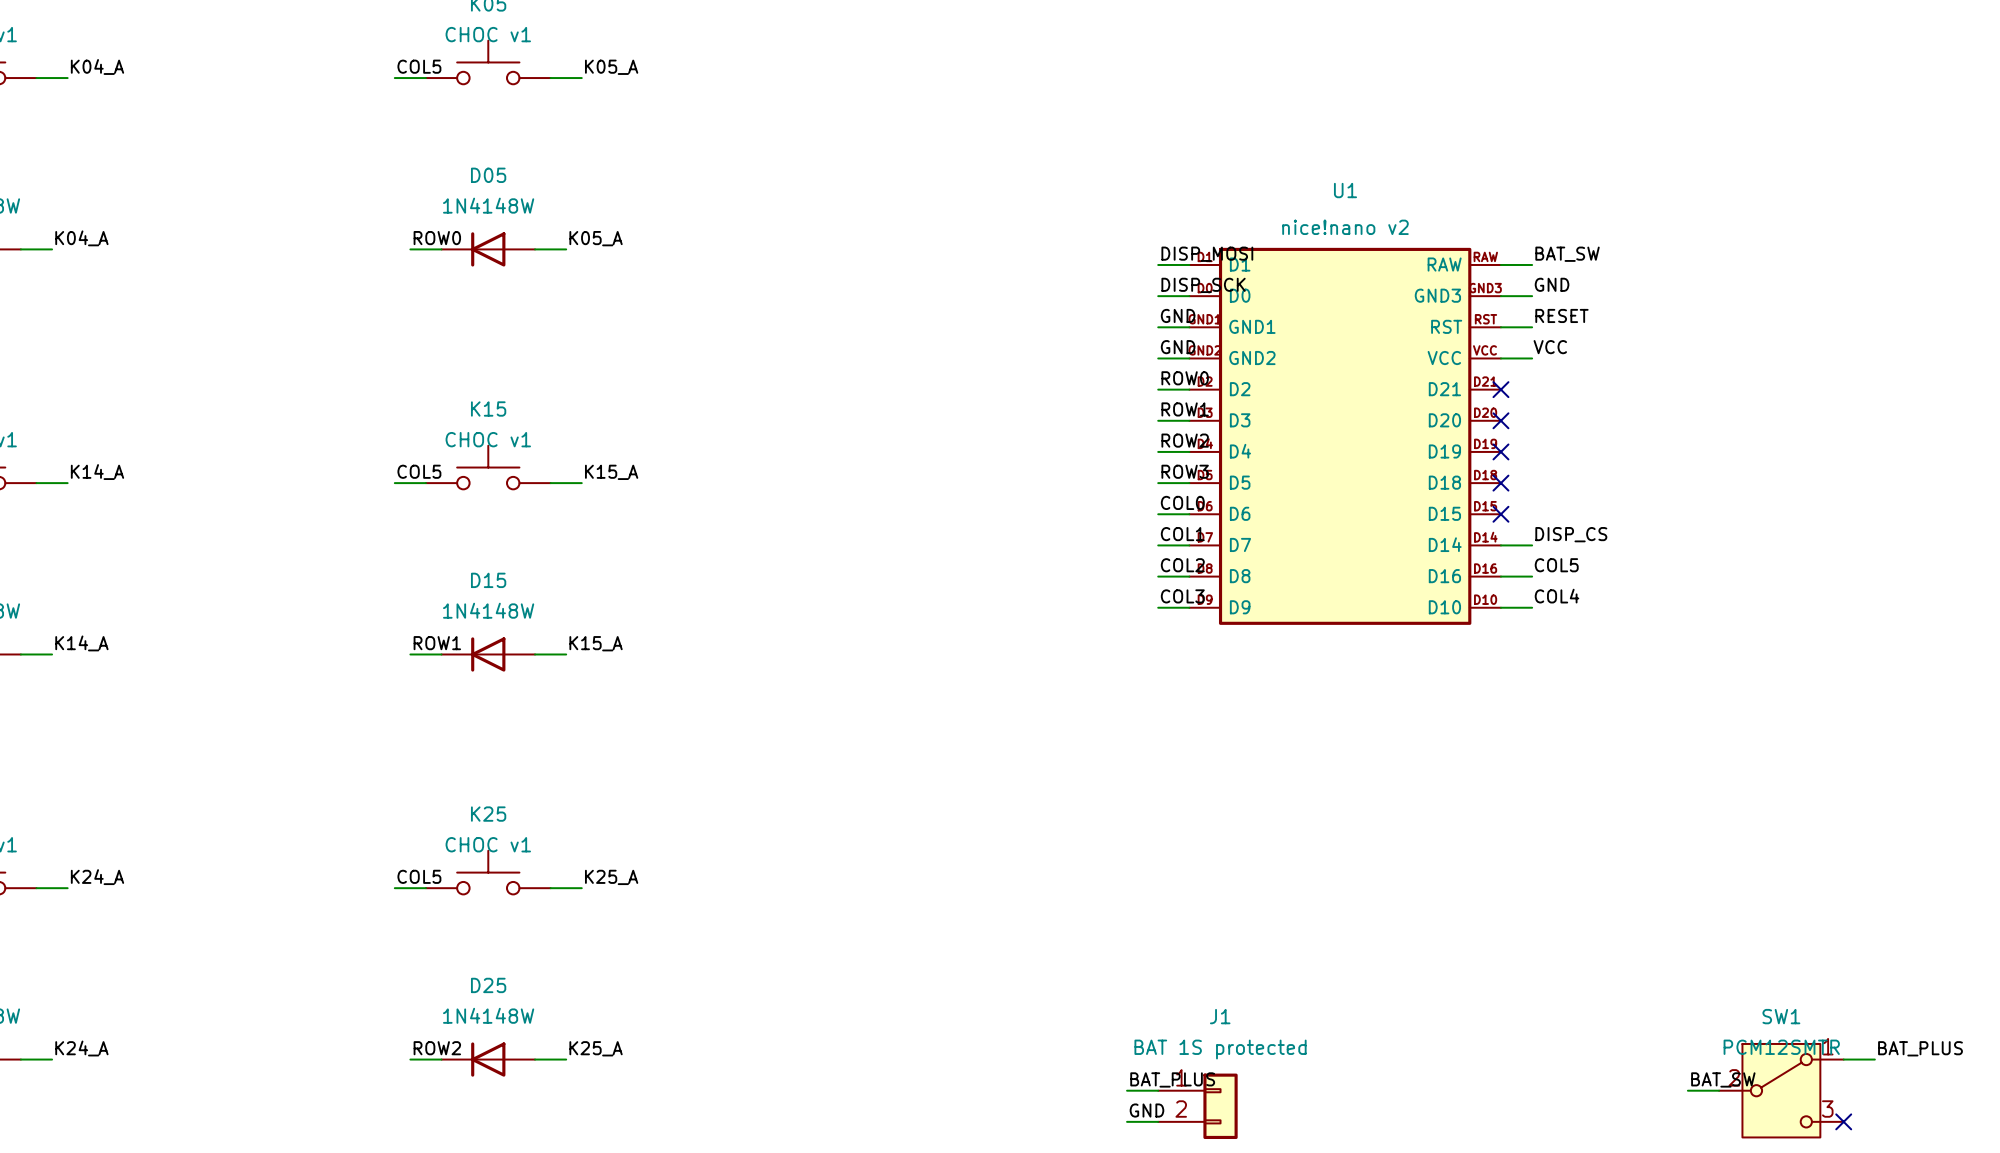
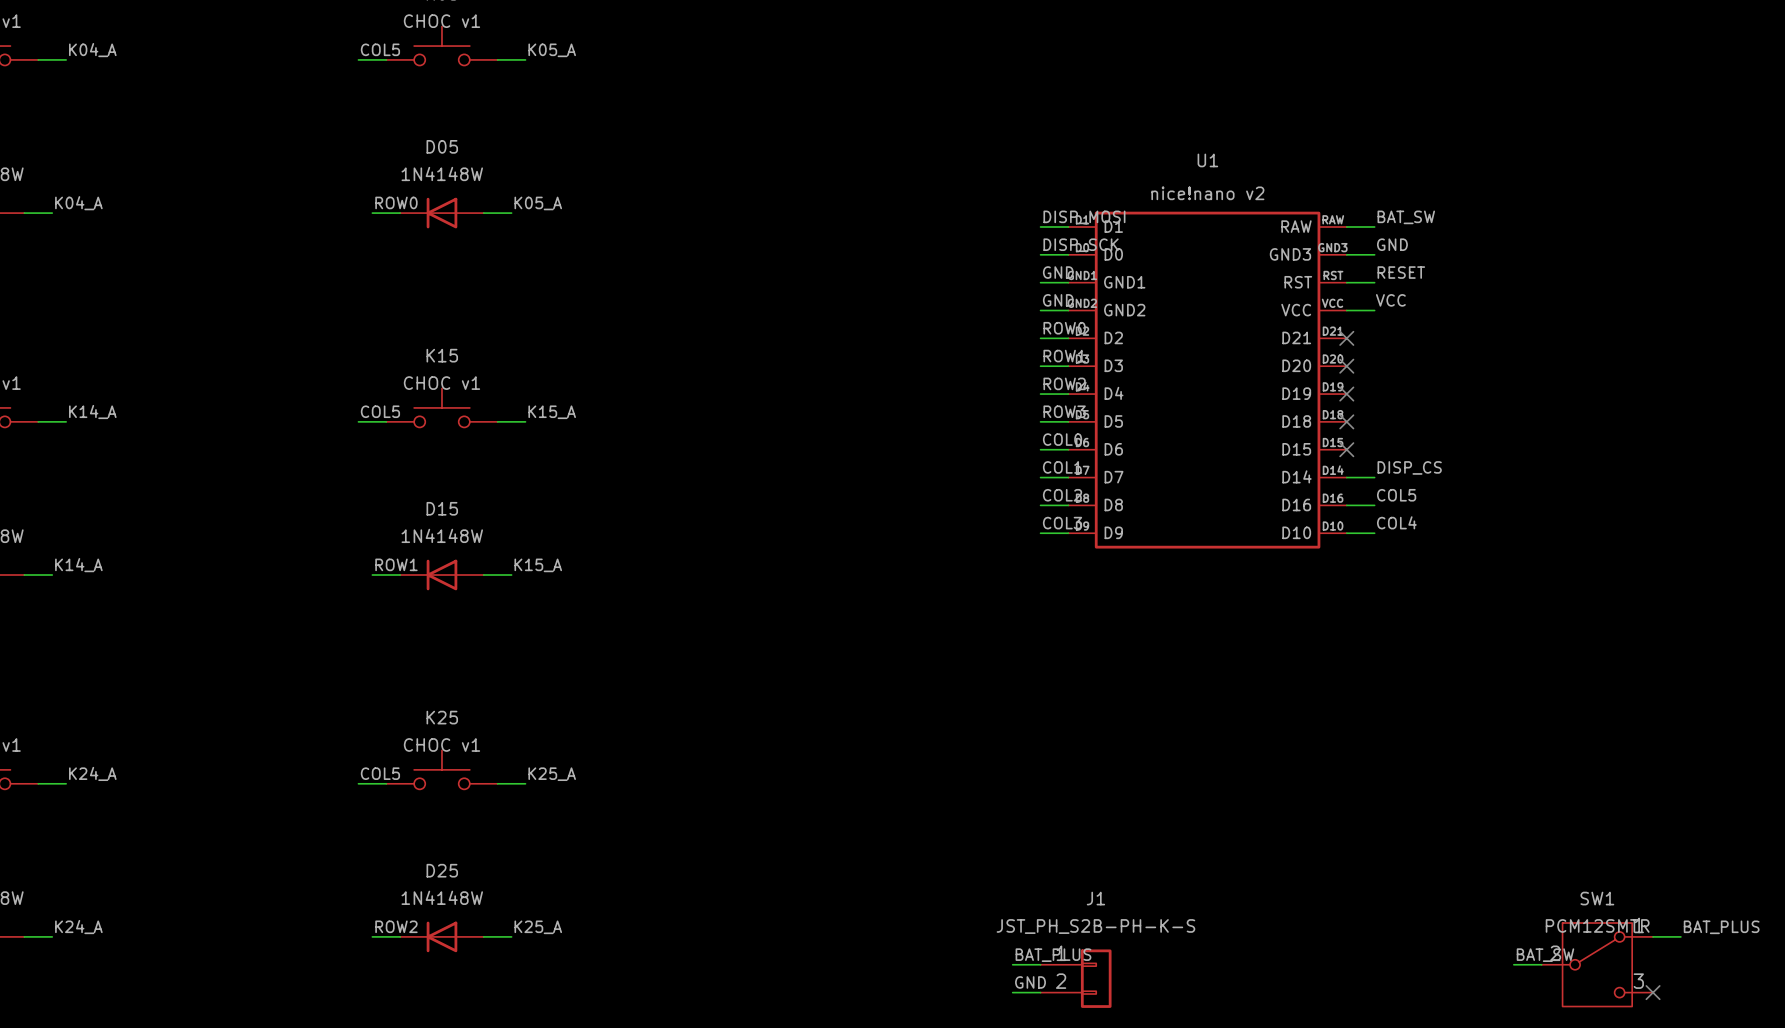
J1 value: BAT 1S protected (1220, 1049) -> JST_PH_S2B-PH-K-S (1095, 926)

